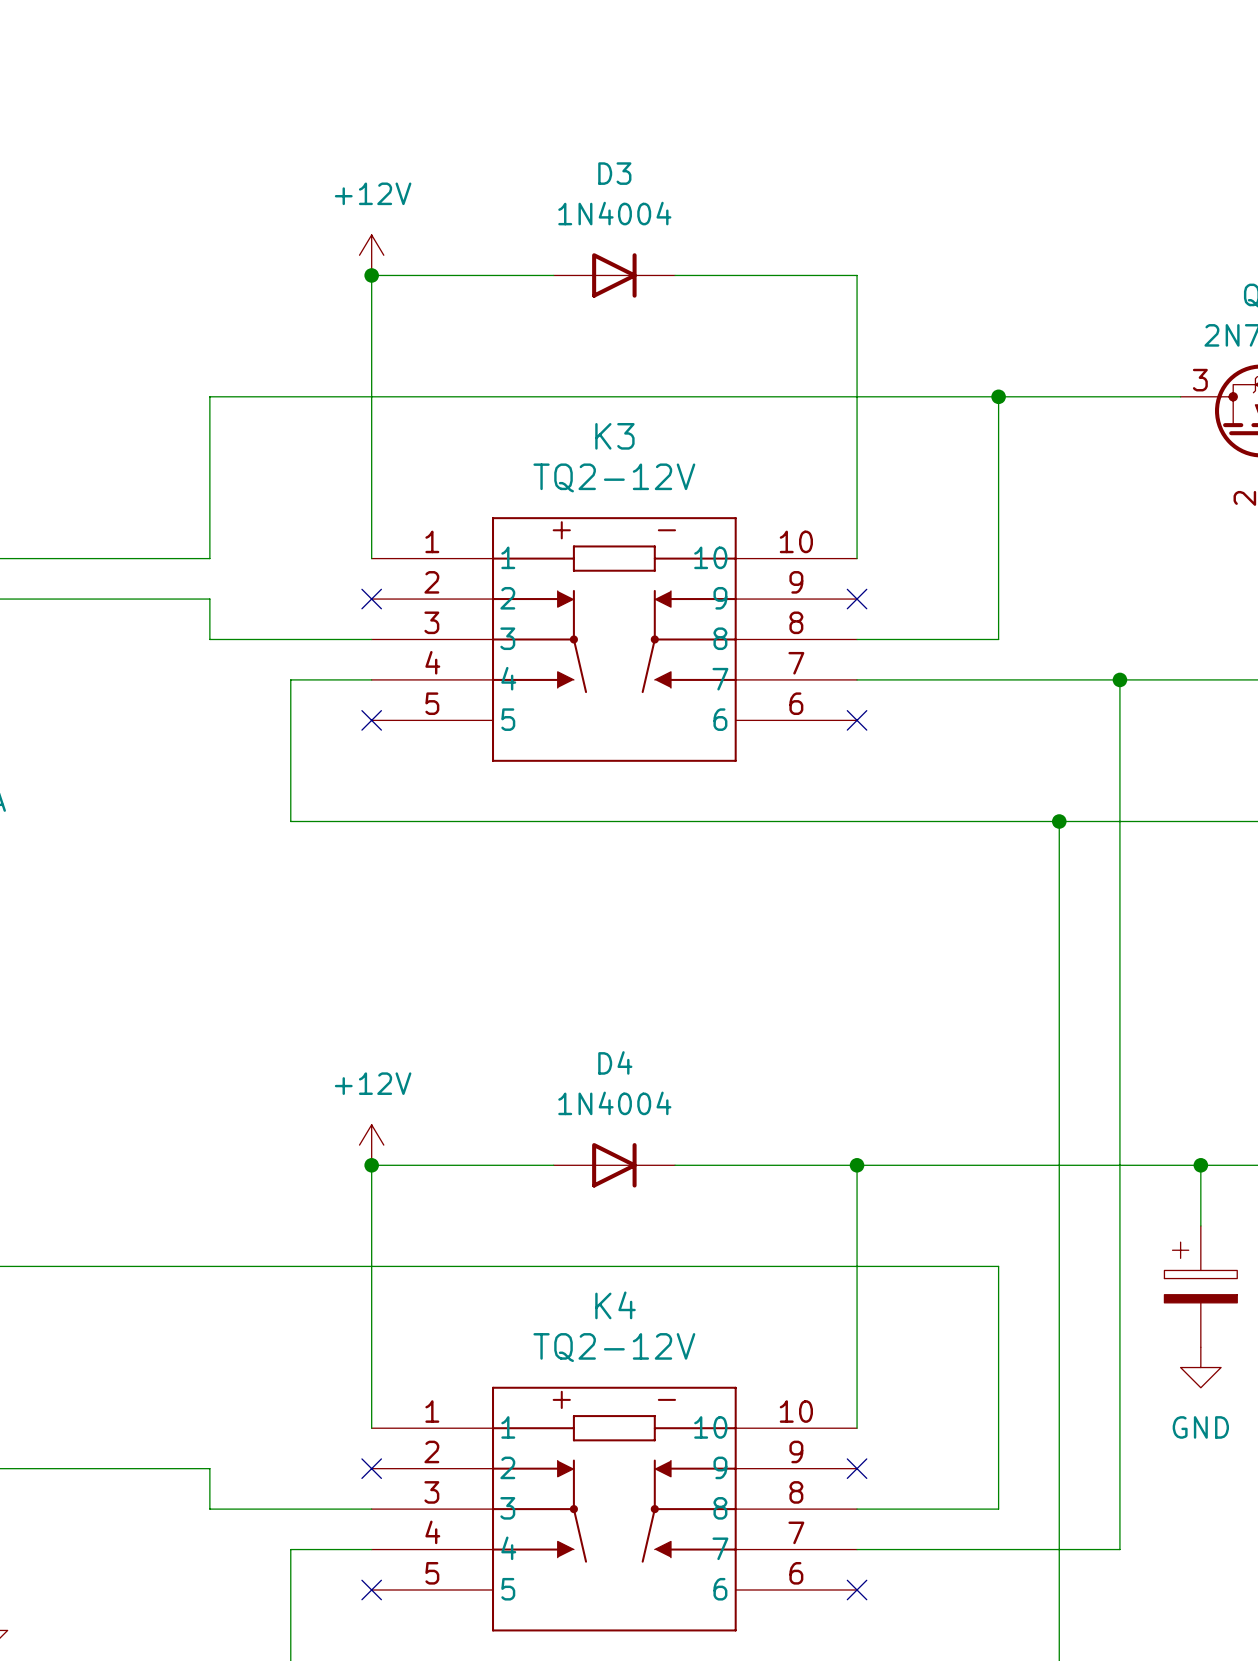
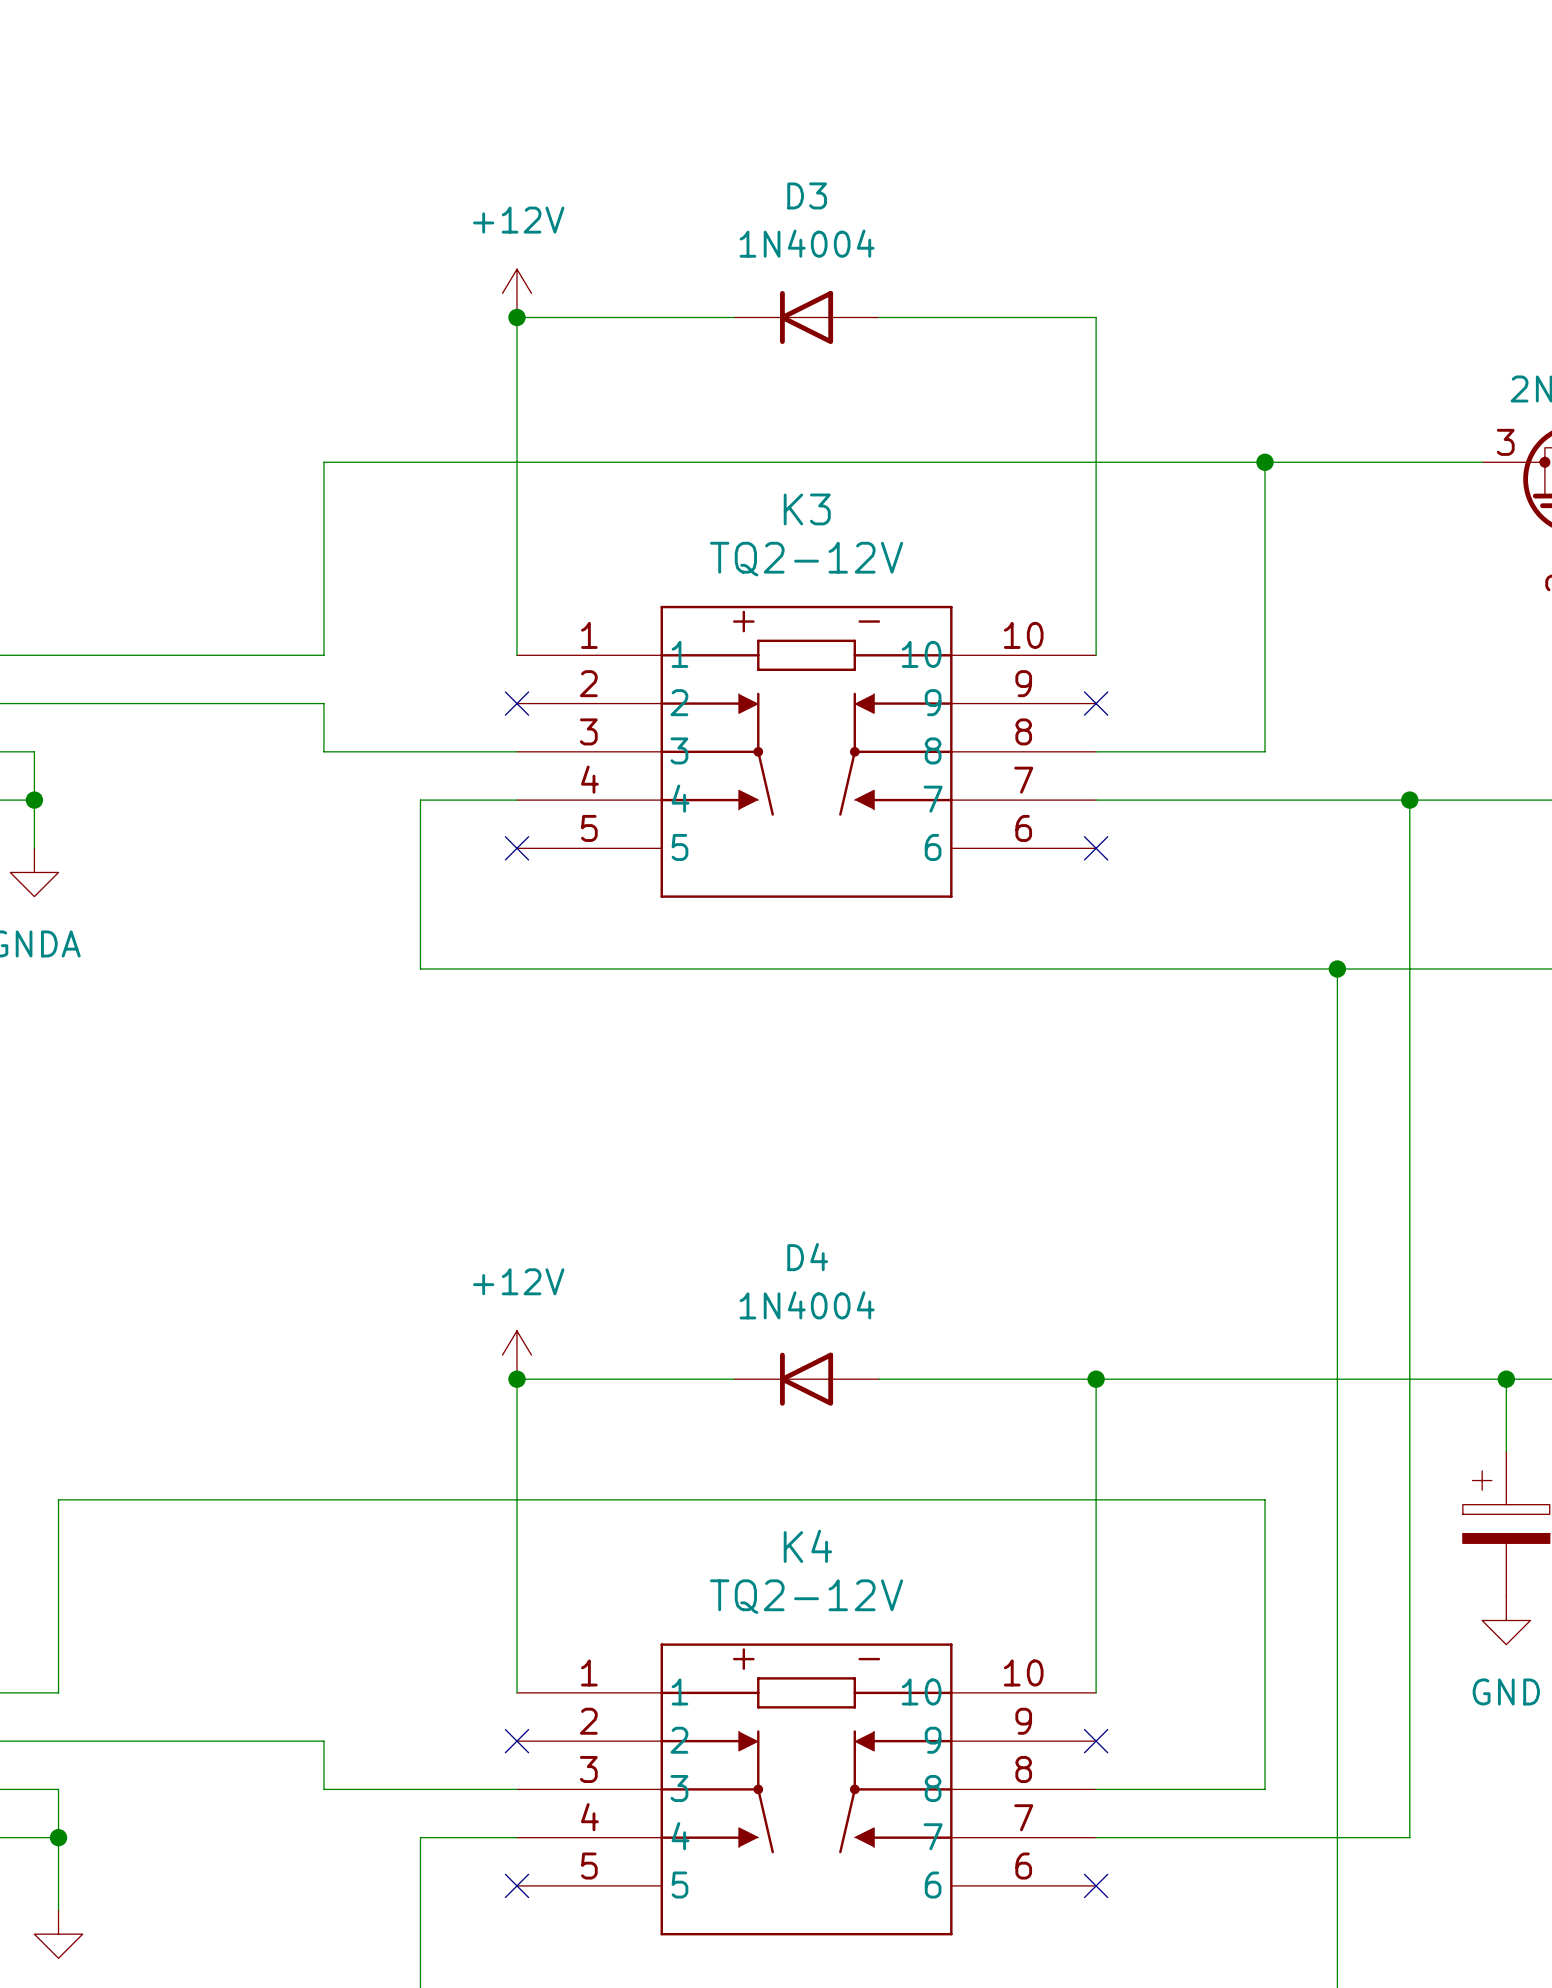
D3 rotation: 0° (614, 275) -> 180° (806, 317)
D4 rotation: 0° (614, 1165) -> 180° (806, 1379)

